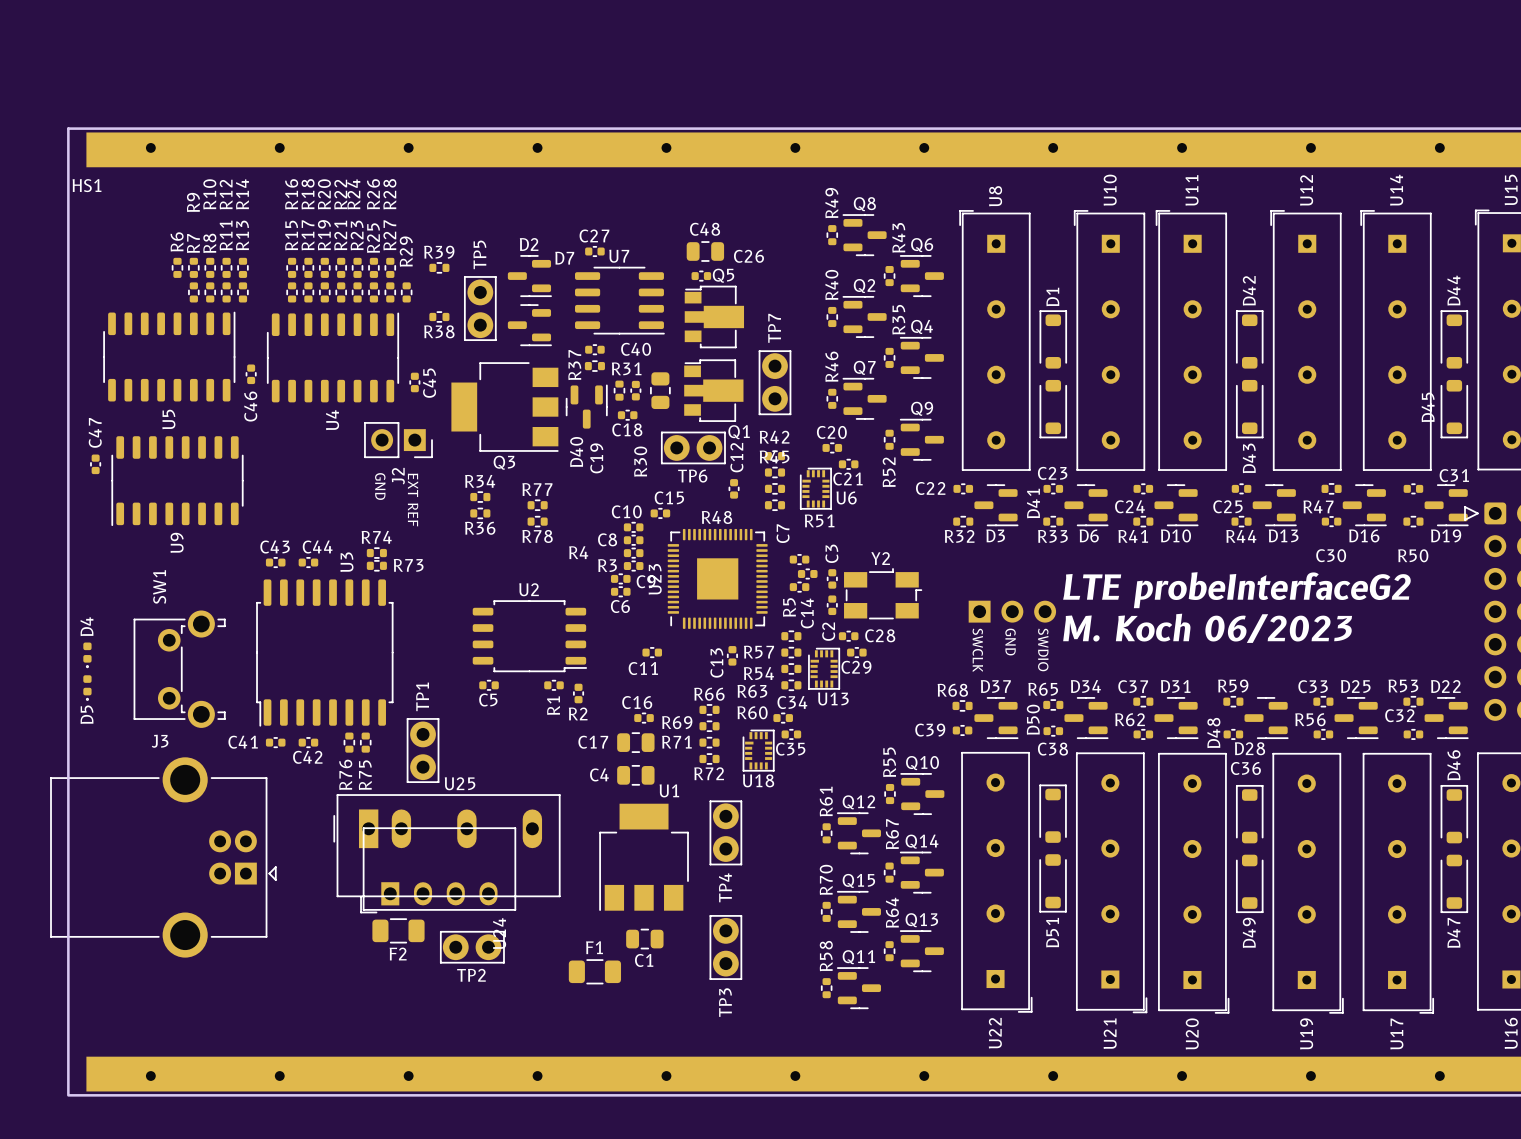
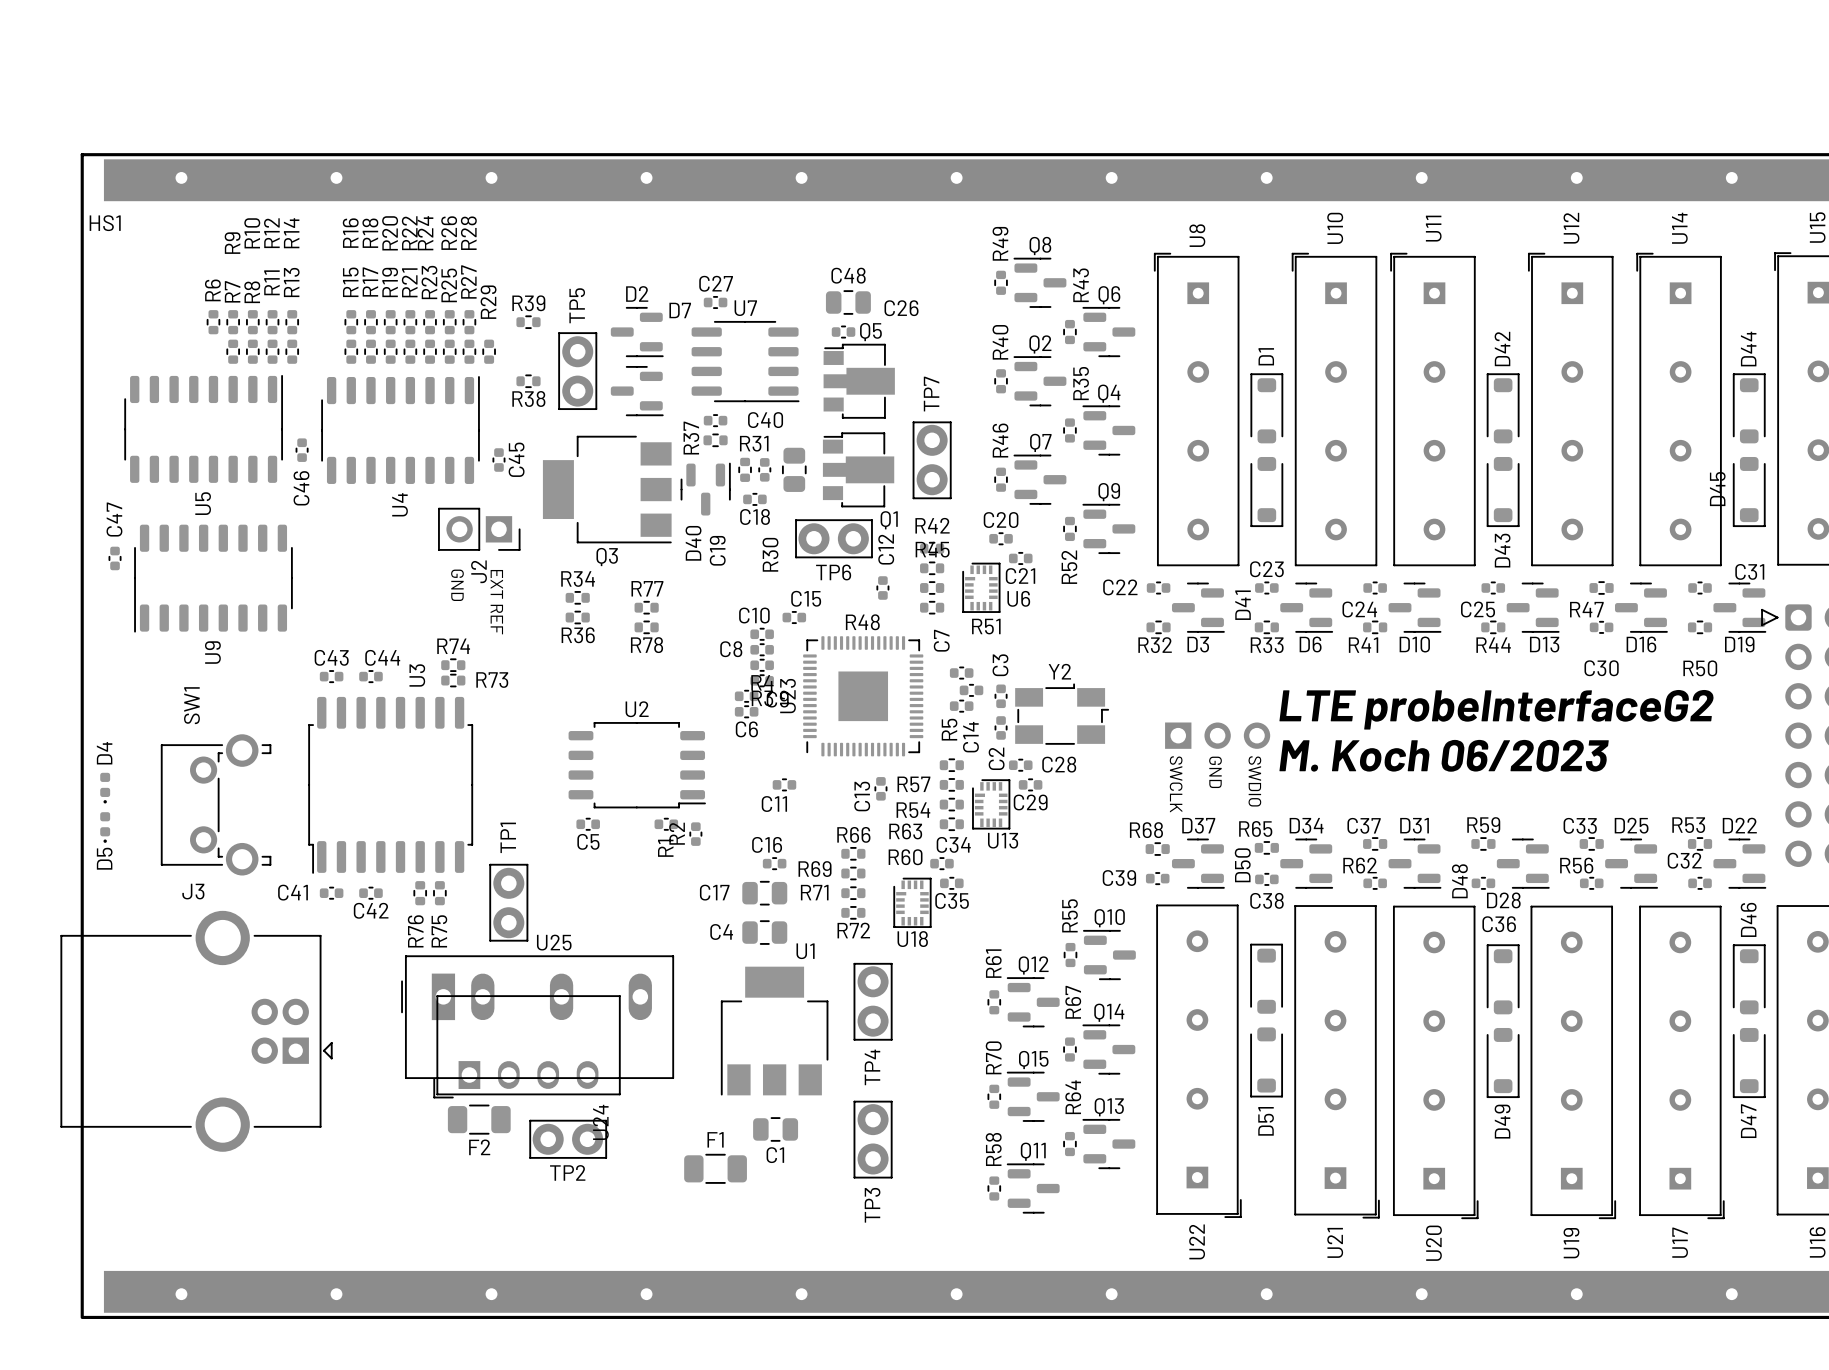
R4 name position: R4 (578, 552) -> R4 (762, 682)
R3 name position: R3 (607, 565) -> R3 (762, 698)
R2 name rotation: 0° (578, 713) -> 90° counterclockwise (677, 833)

